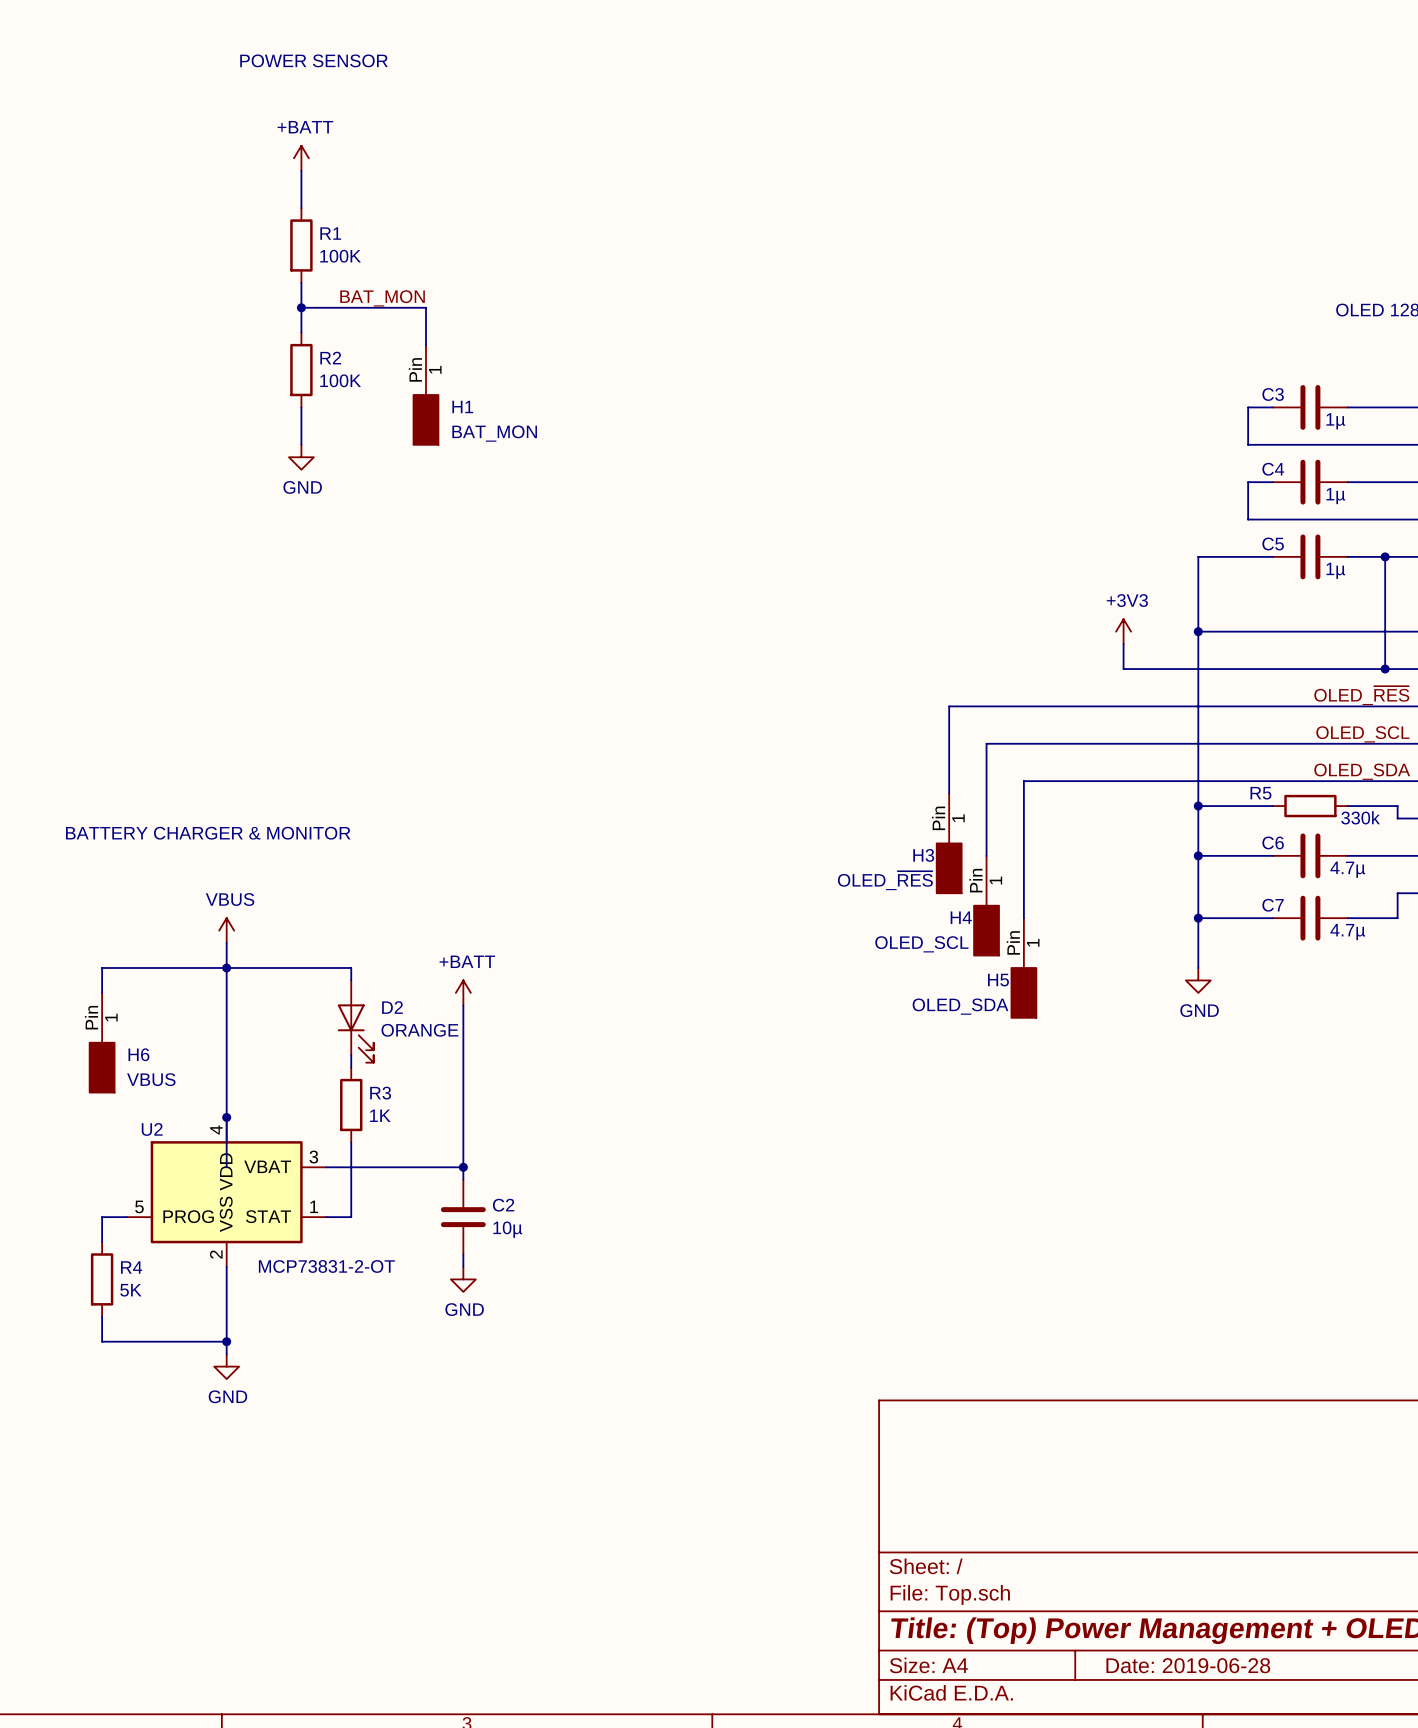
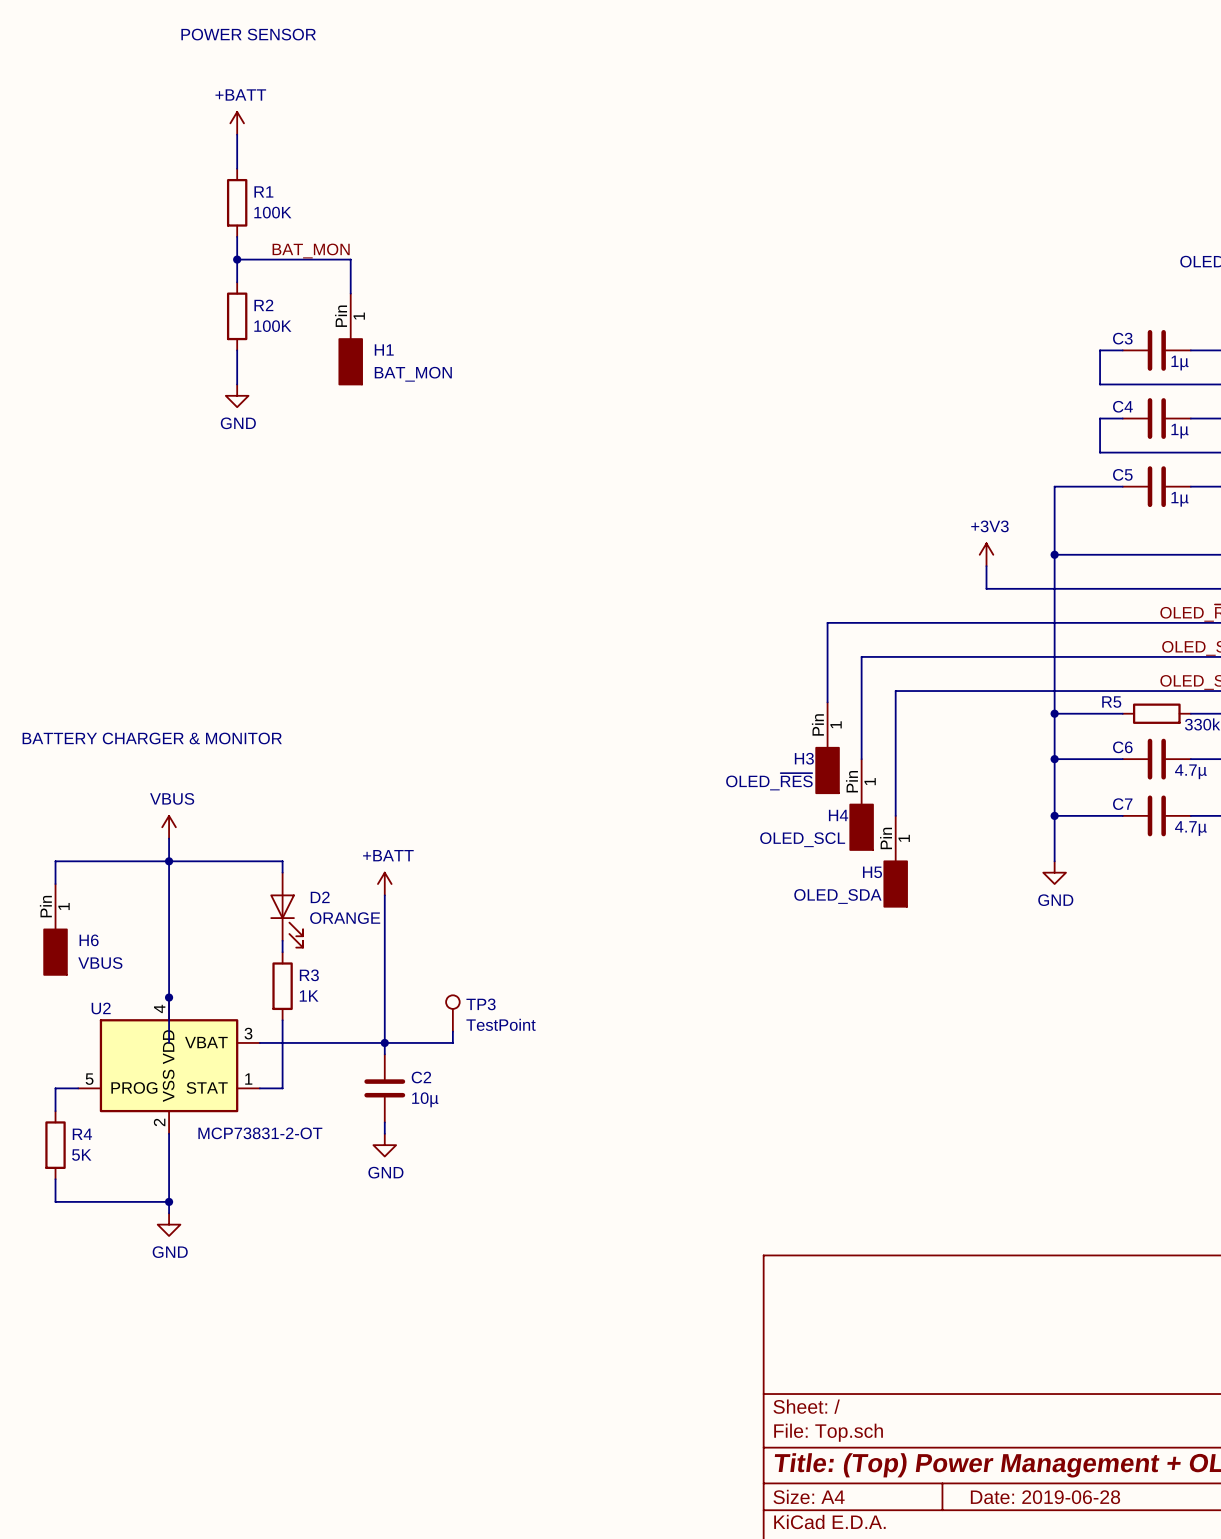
TP3: none -> TestPoint (452, 1013)
wire: none -> (452, 1031) (452, 1042) (384, 1042)

